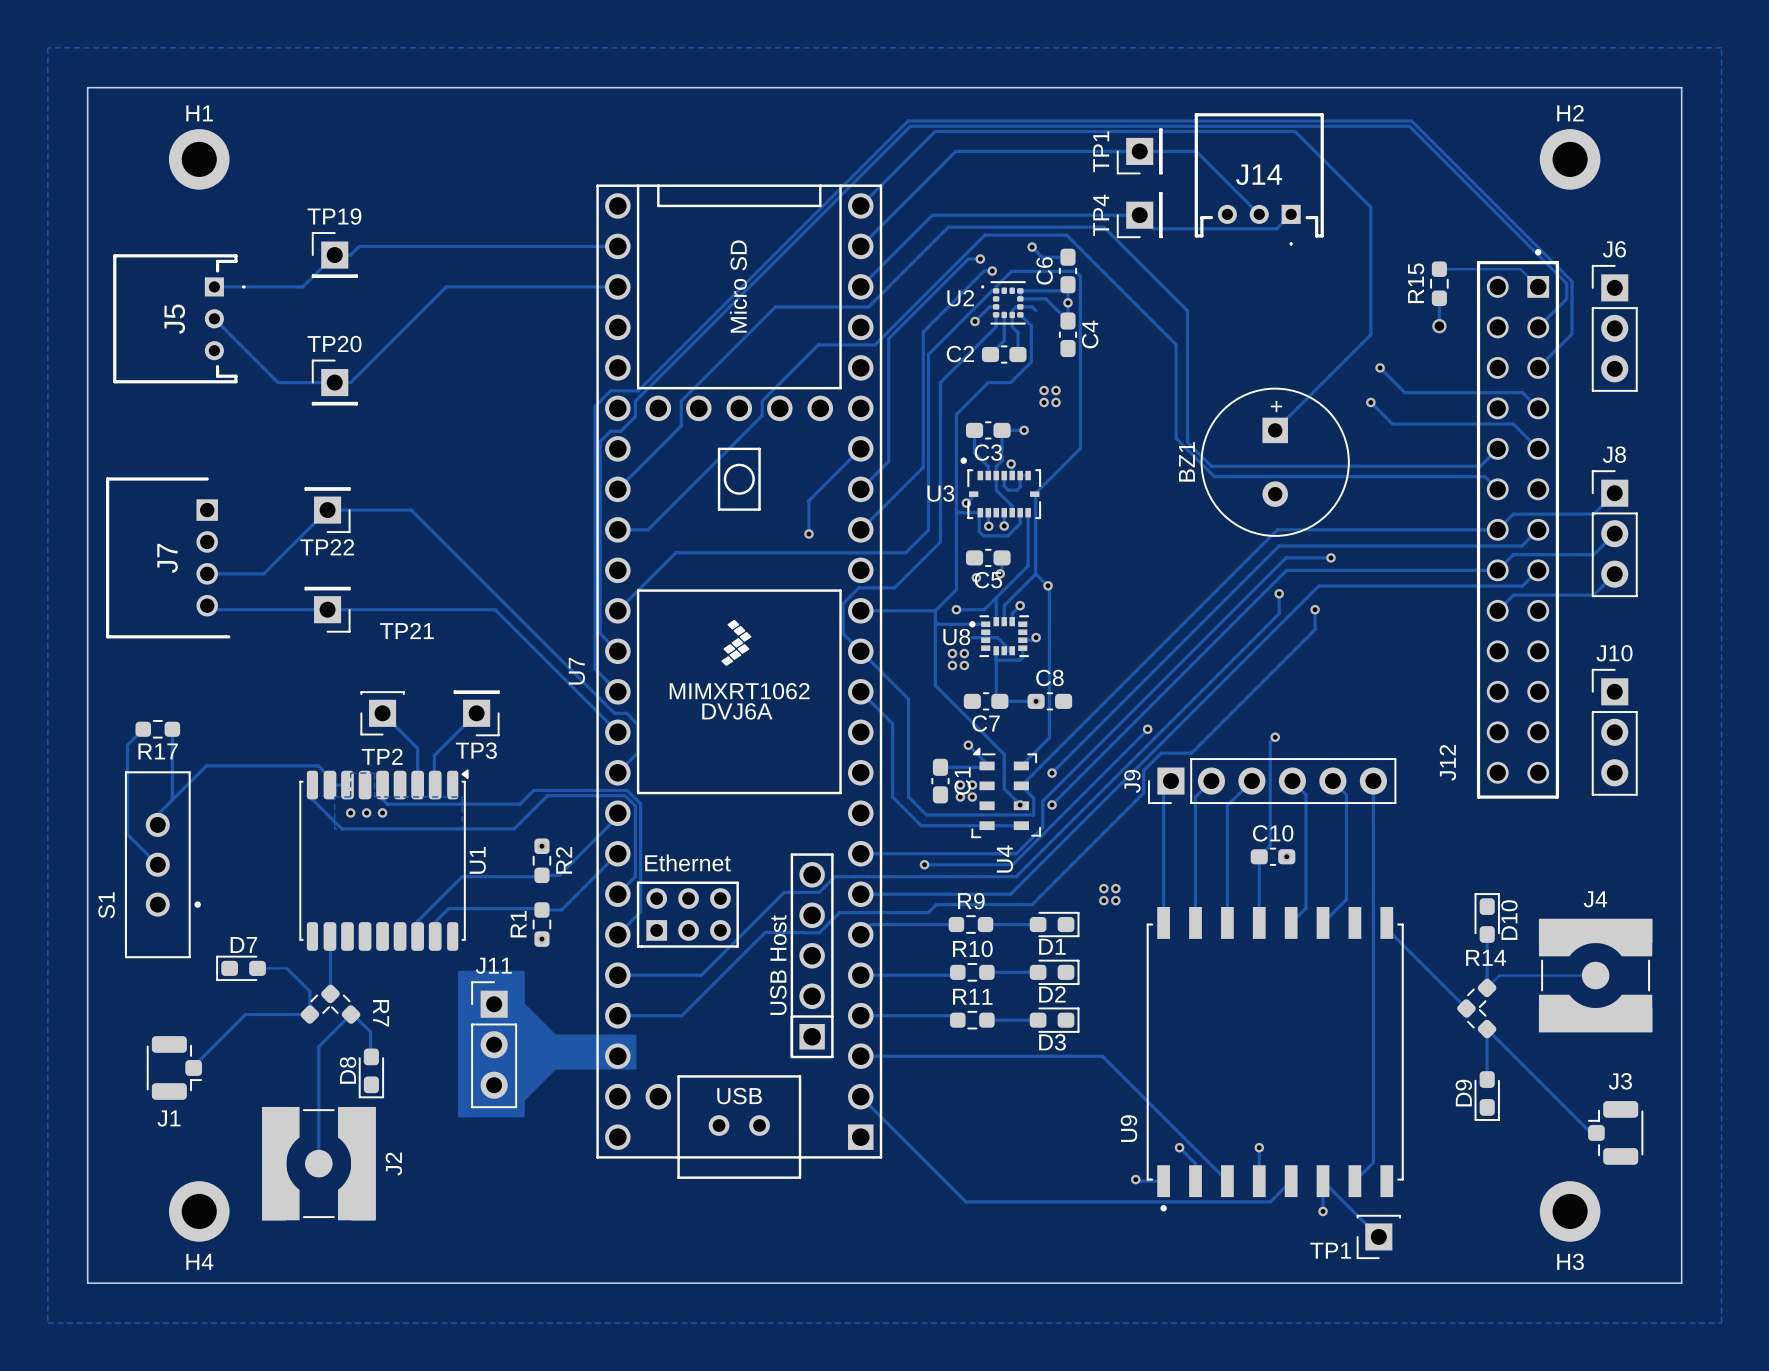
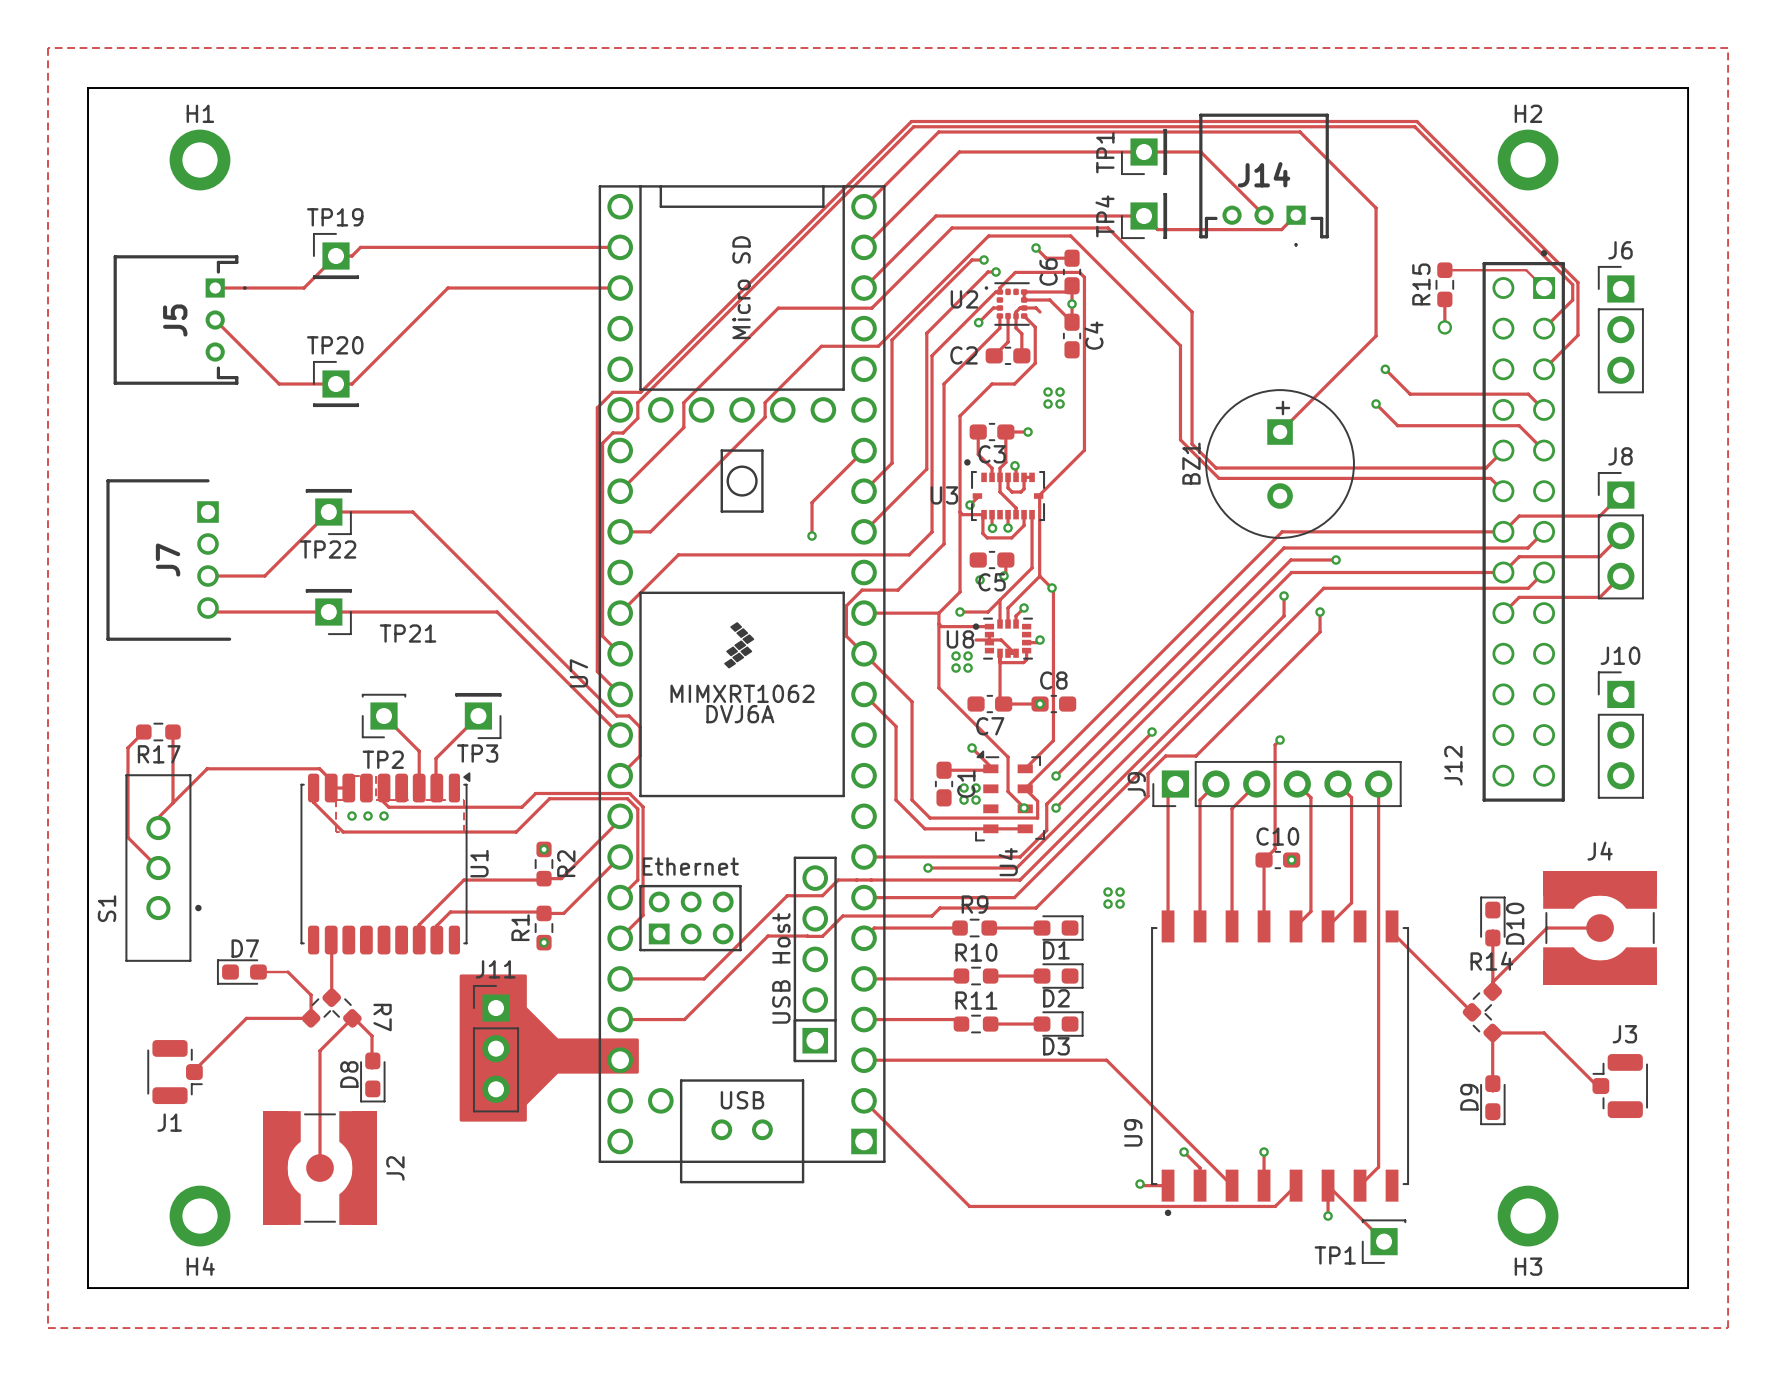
H2 position: (1570, 159) -> (1528, 160)
track: none -> (1600, 928) (1546, 928) (1492, 982)
track: (1595, 975) (1499, 975) (1487, 987) -> none
J4 position: (1595, 975) -> (1600, 928)
track: (1487, 1029) (1590, 1132) (1596, 1132) -> (1492, 1032) (1544, 1032) (1599, 1088)
J3 position: (1615, 1132) -> (1620, 1086)
H3 position: (1570, 1211) -> (1528, 1216)

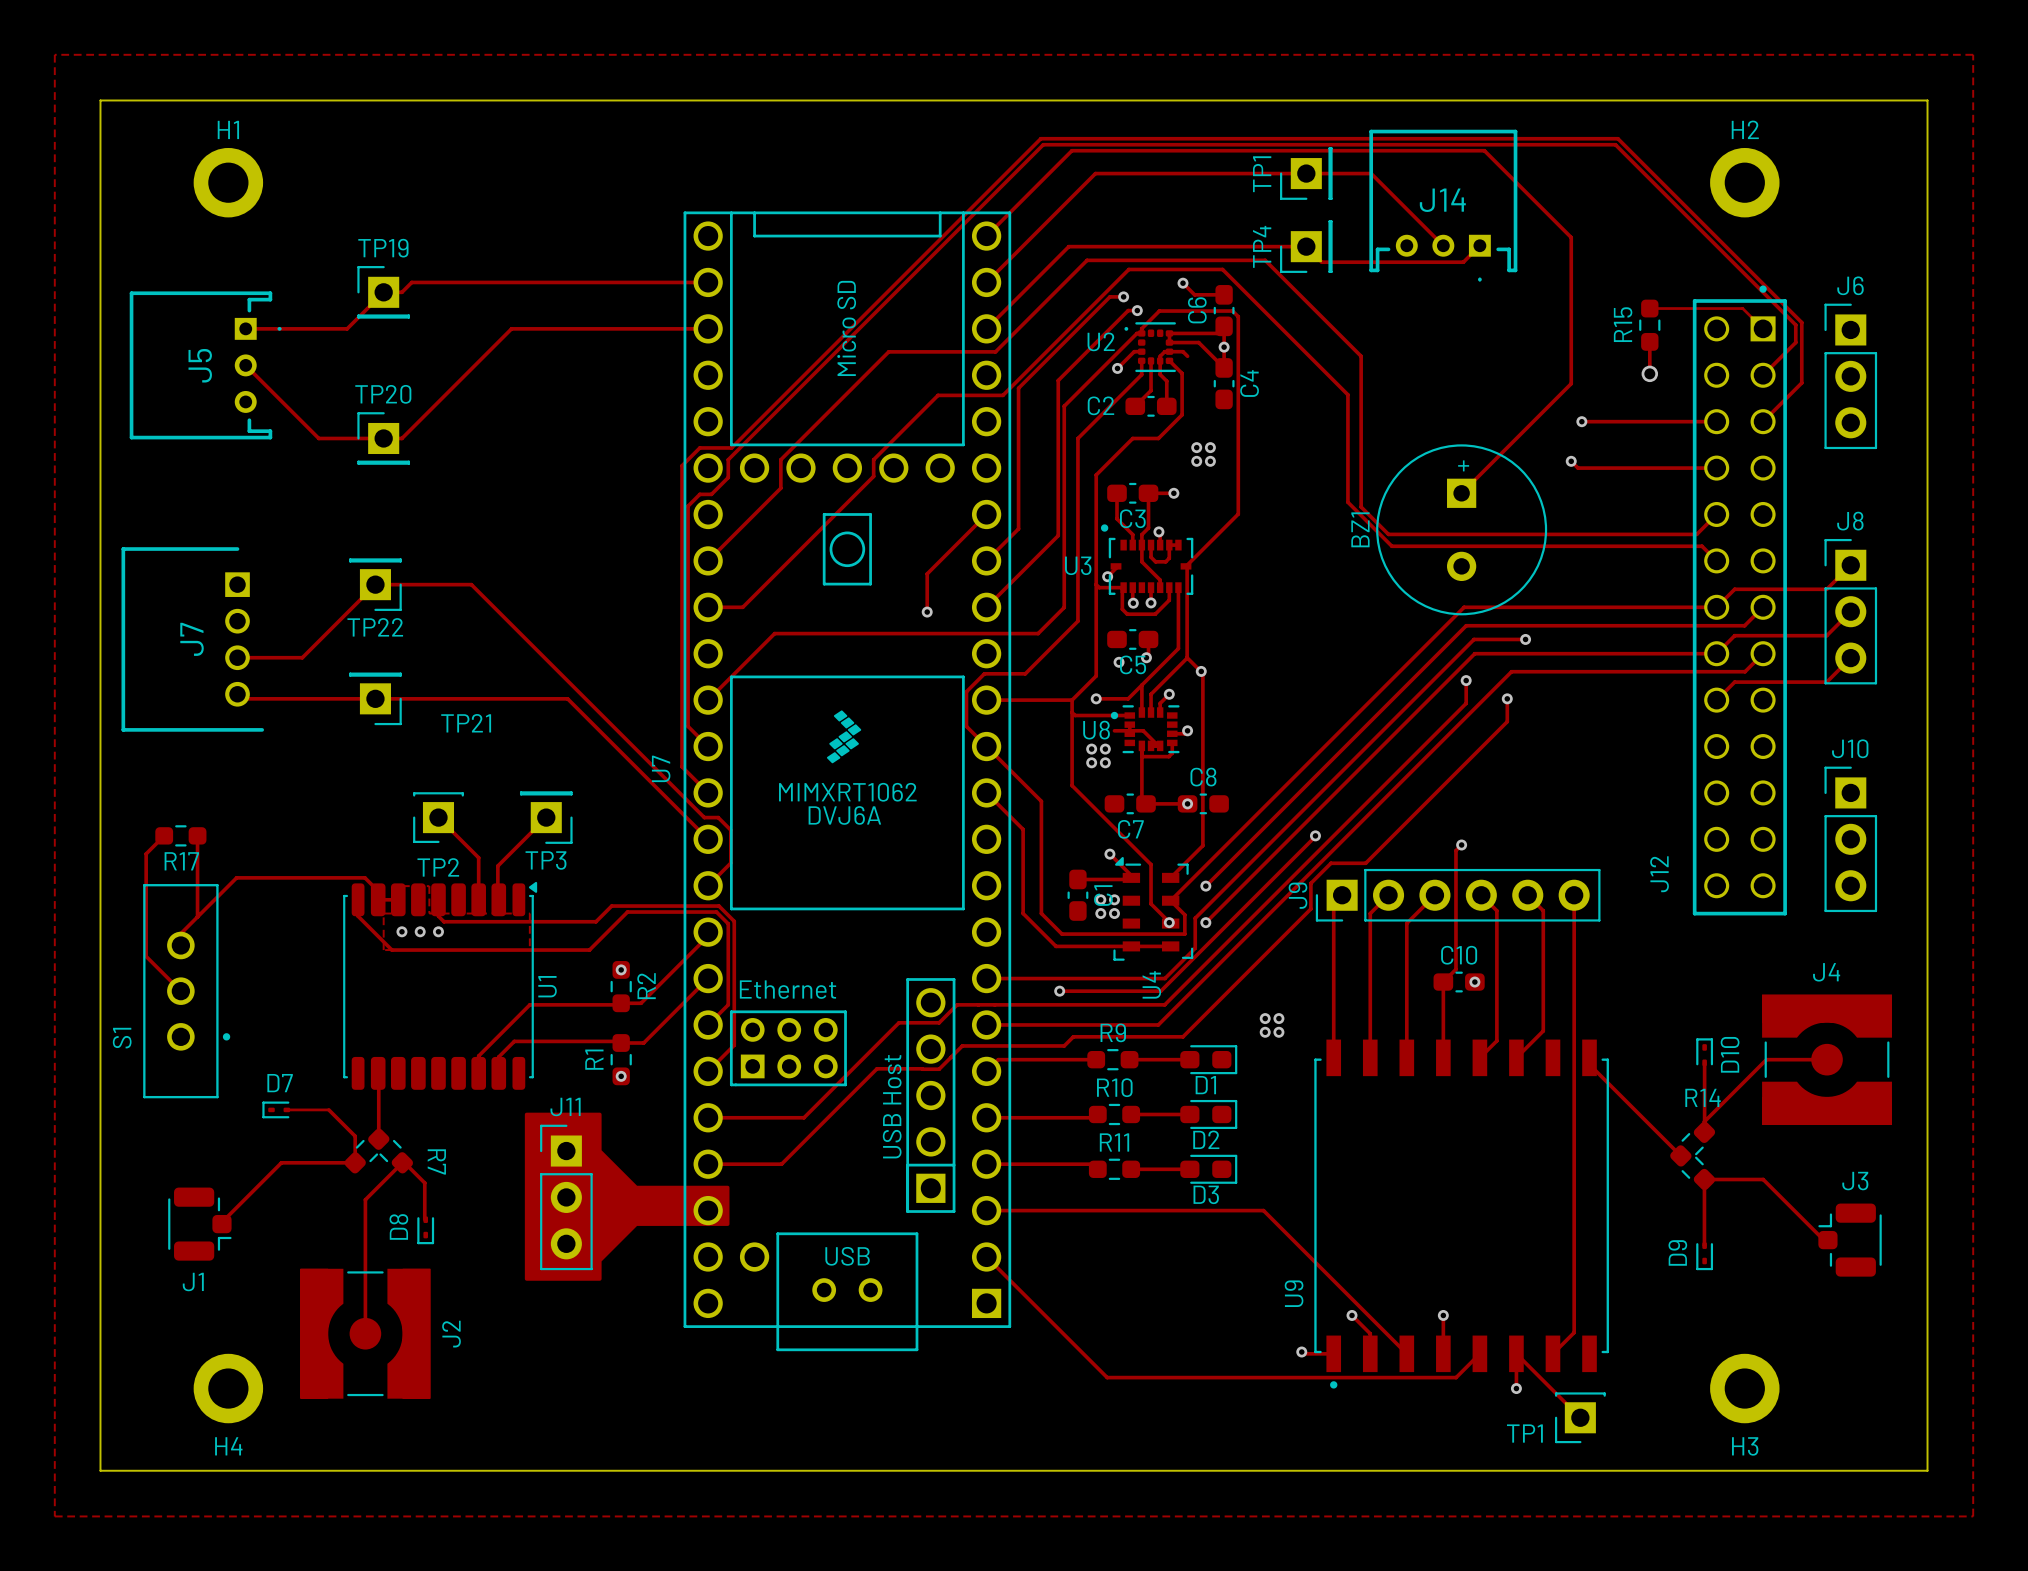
track: (1385, 369) (1410, 394) (1528, 394) (1544, 409) -> (1581, 421) (1716, 421)
track: (1381, 409) (1397, 425) (1519, 425) (1544, 450) -> (1578, 468) (1716, 468)
D10 footprint: [1480, 896, 1506, 947] -> [1696, 1038, 1714, 1067]
D7 footprint: [216, 959, 267, 985] -> [262, 1101, 291, 1119]
D8 footprint: [360, 1052, 386, 1103] -> [417, 1216, 435, 1245]
D9 footprint: [1480, 1075, 1506, 1126] -> [1696, 1242, 1714, 1271]

